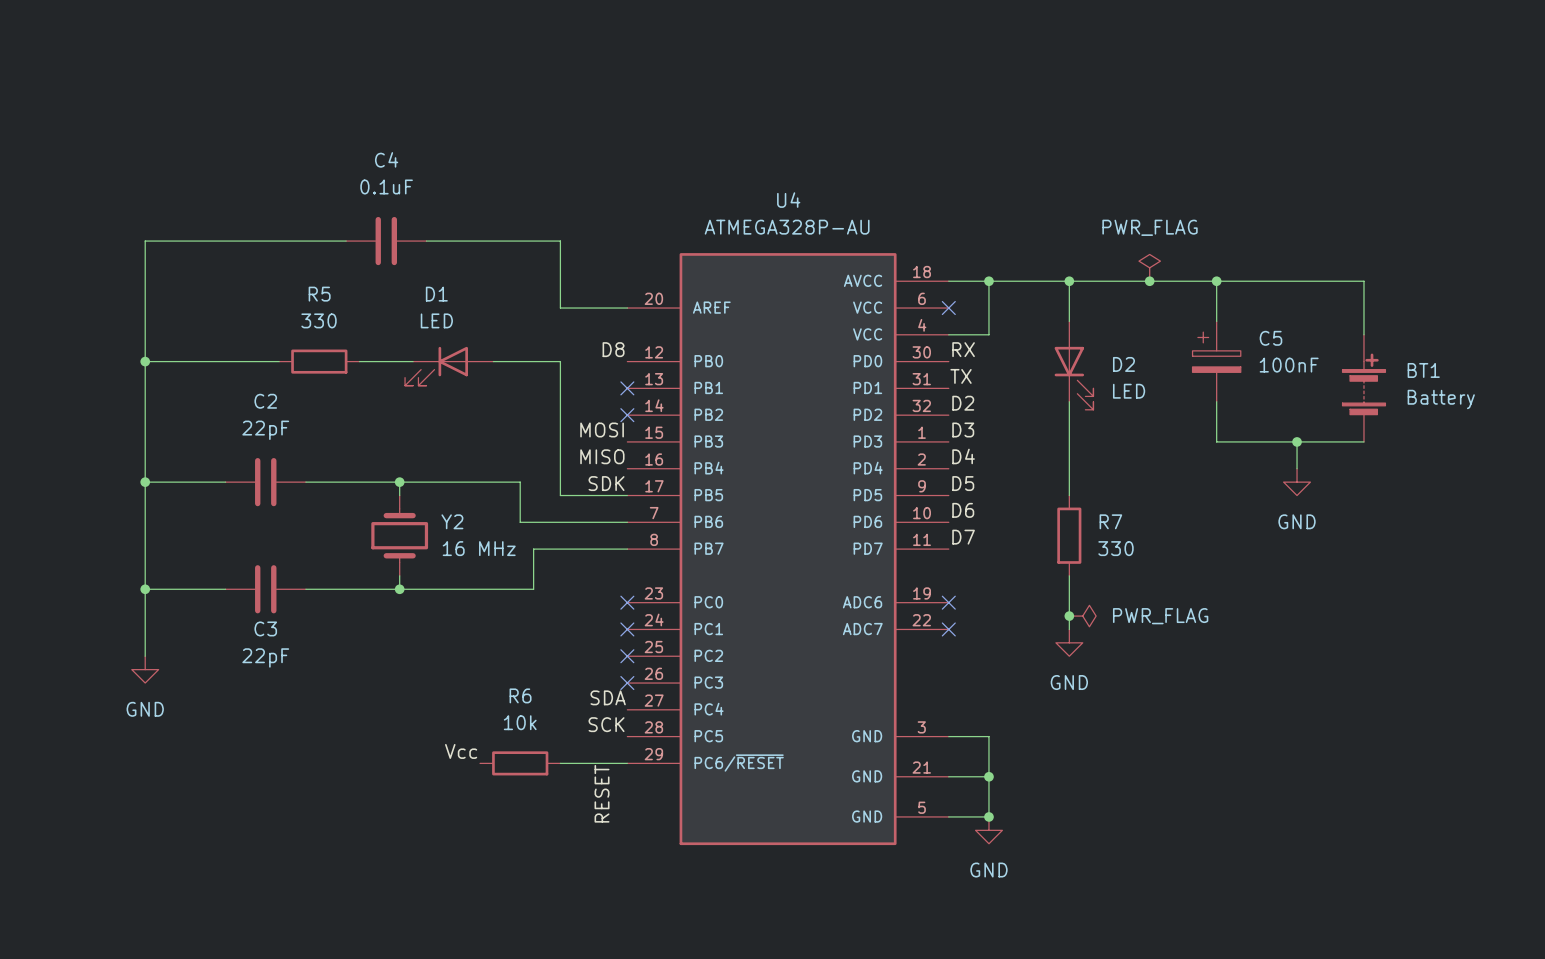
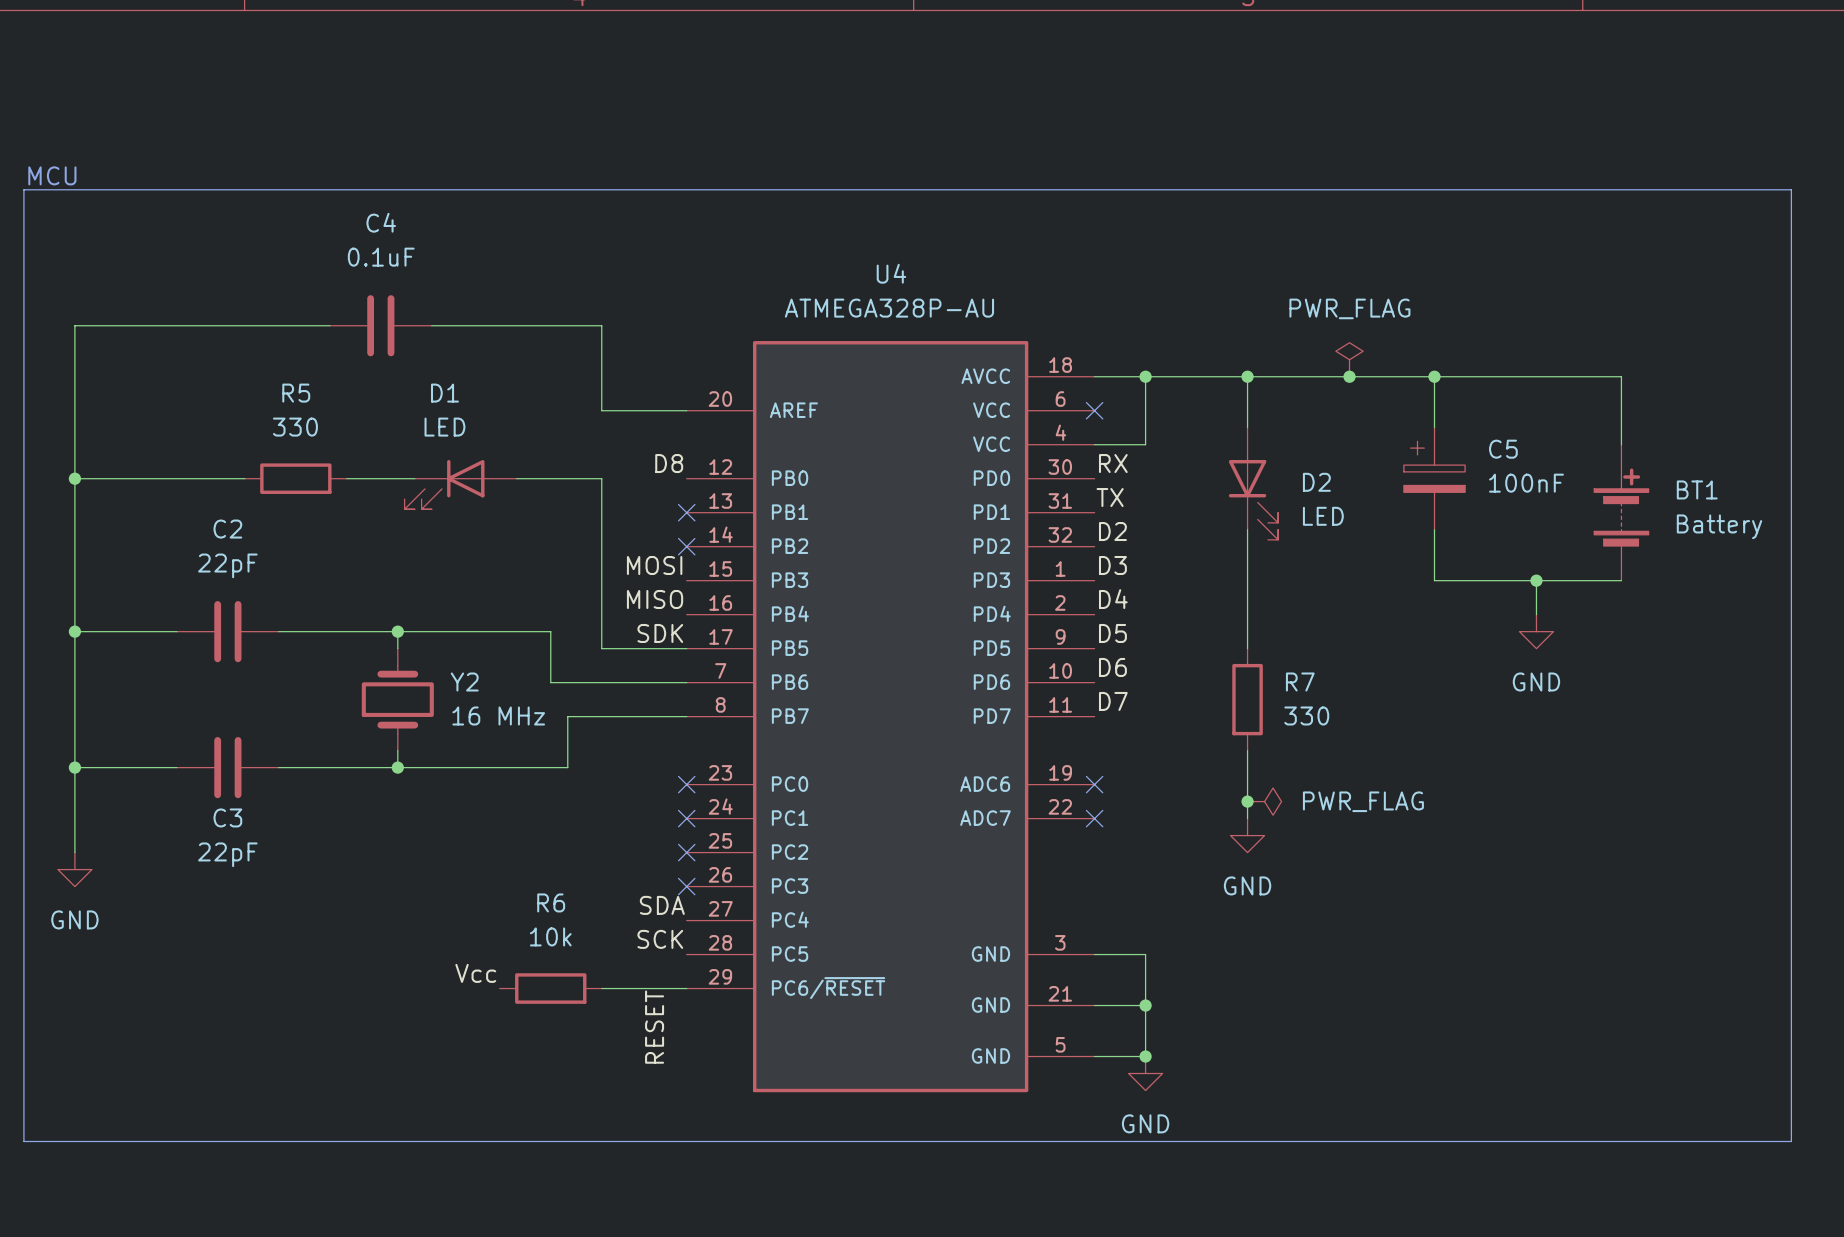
text: none -> MCU (52, 175)
line: none -> (23, 189) (23, 1141) (1791, 1141) (1791, 189) (23, 189)

